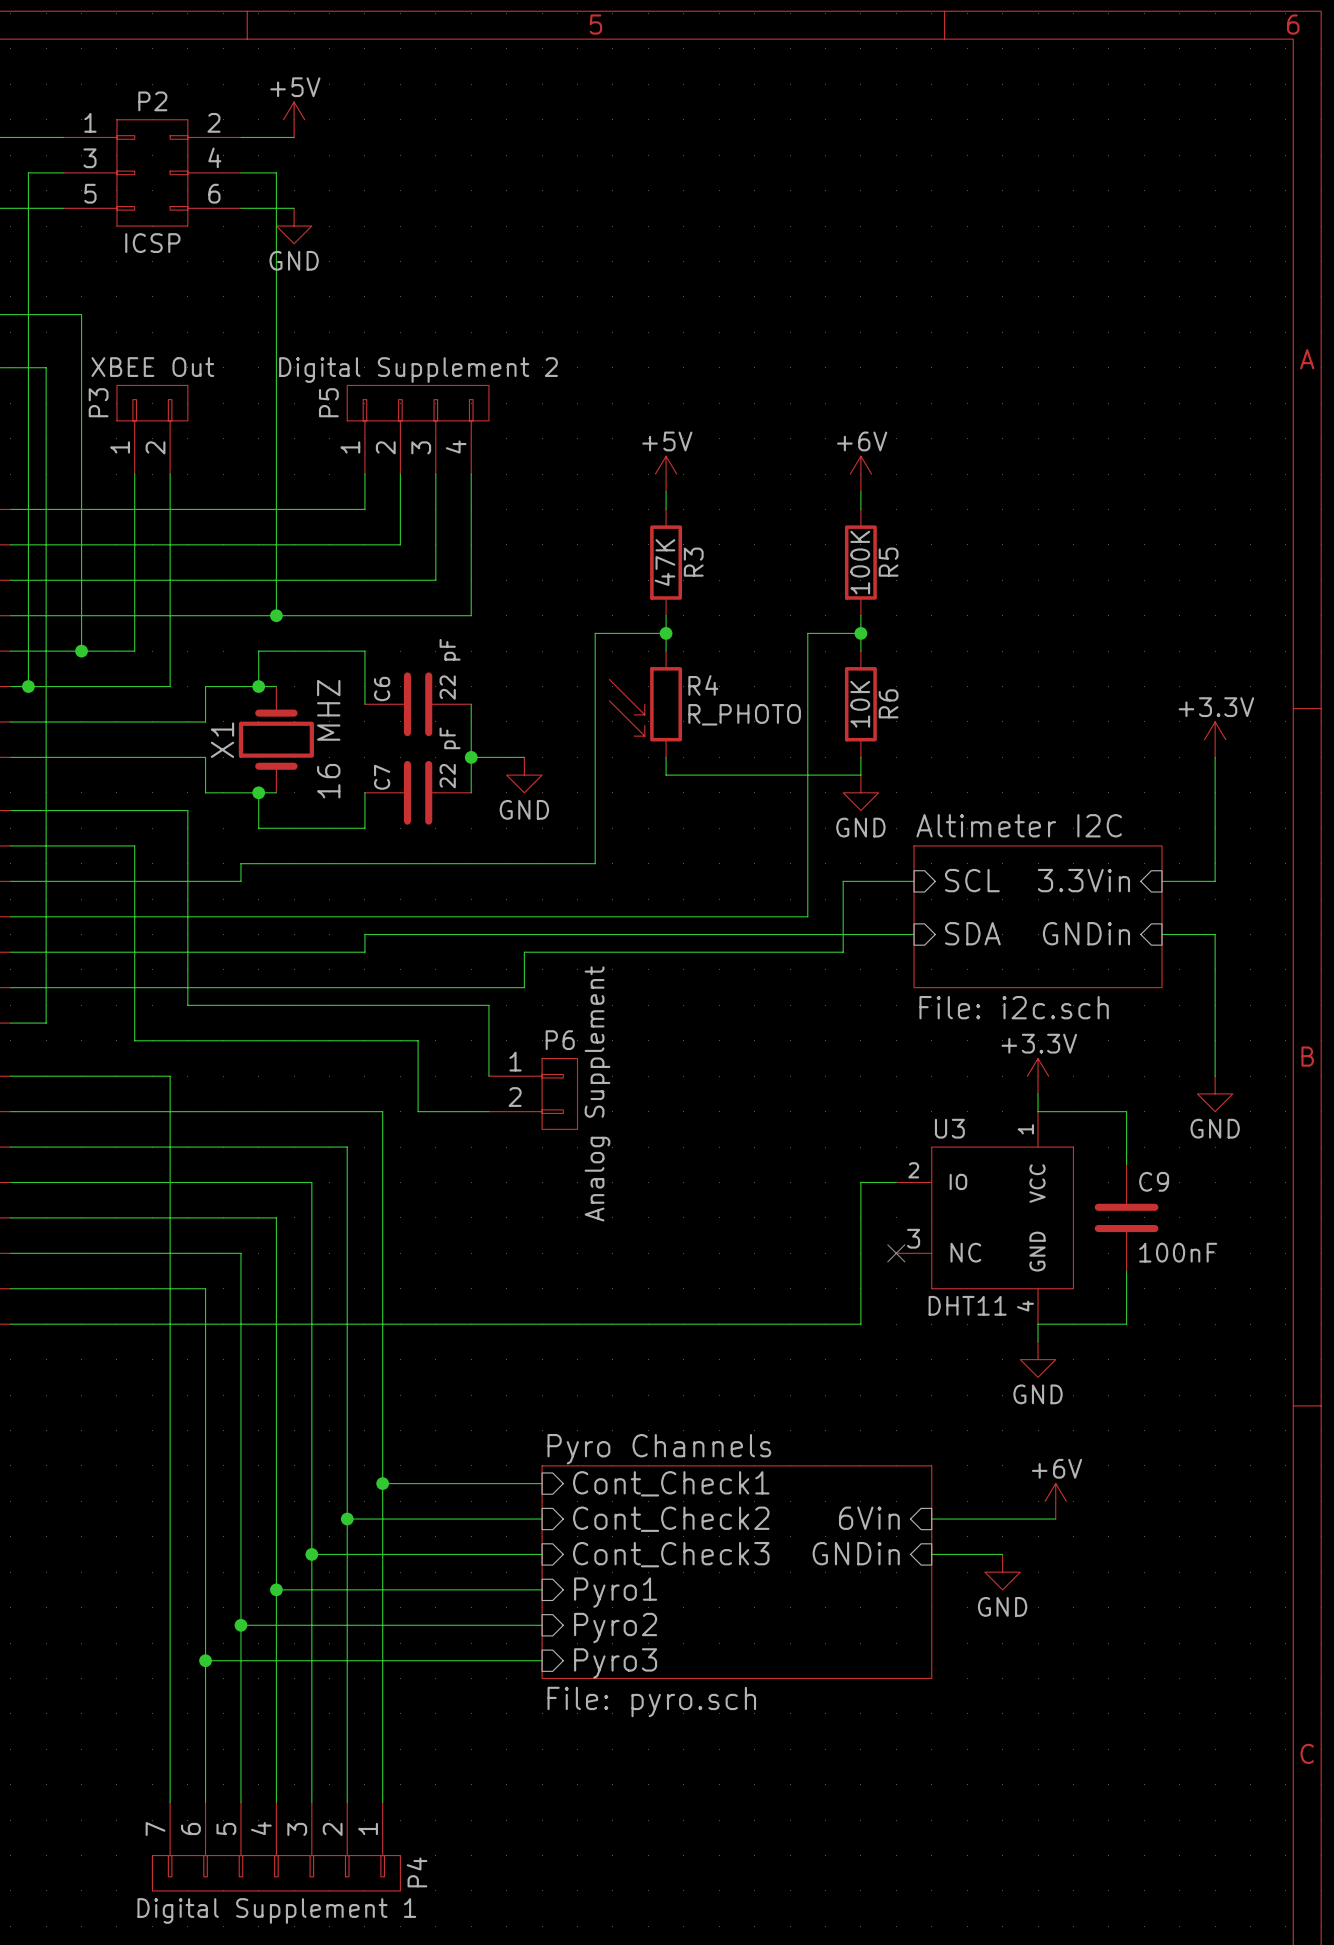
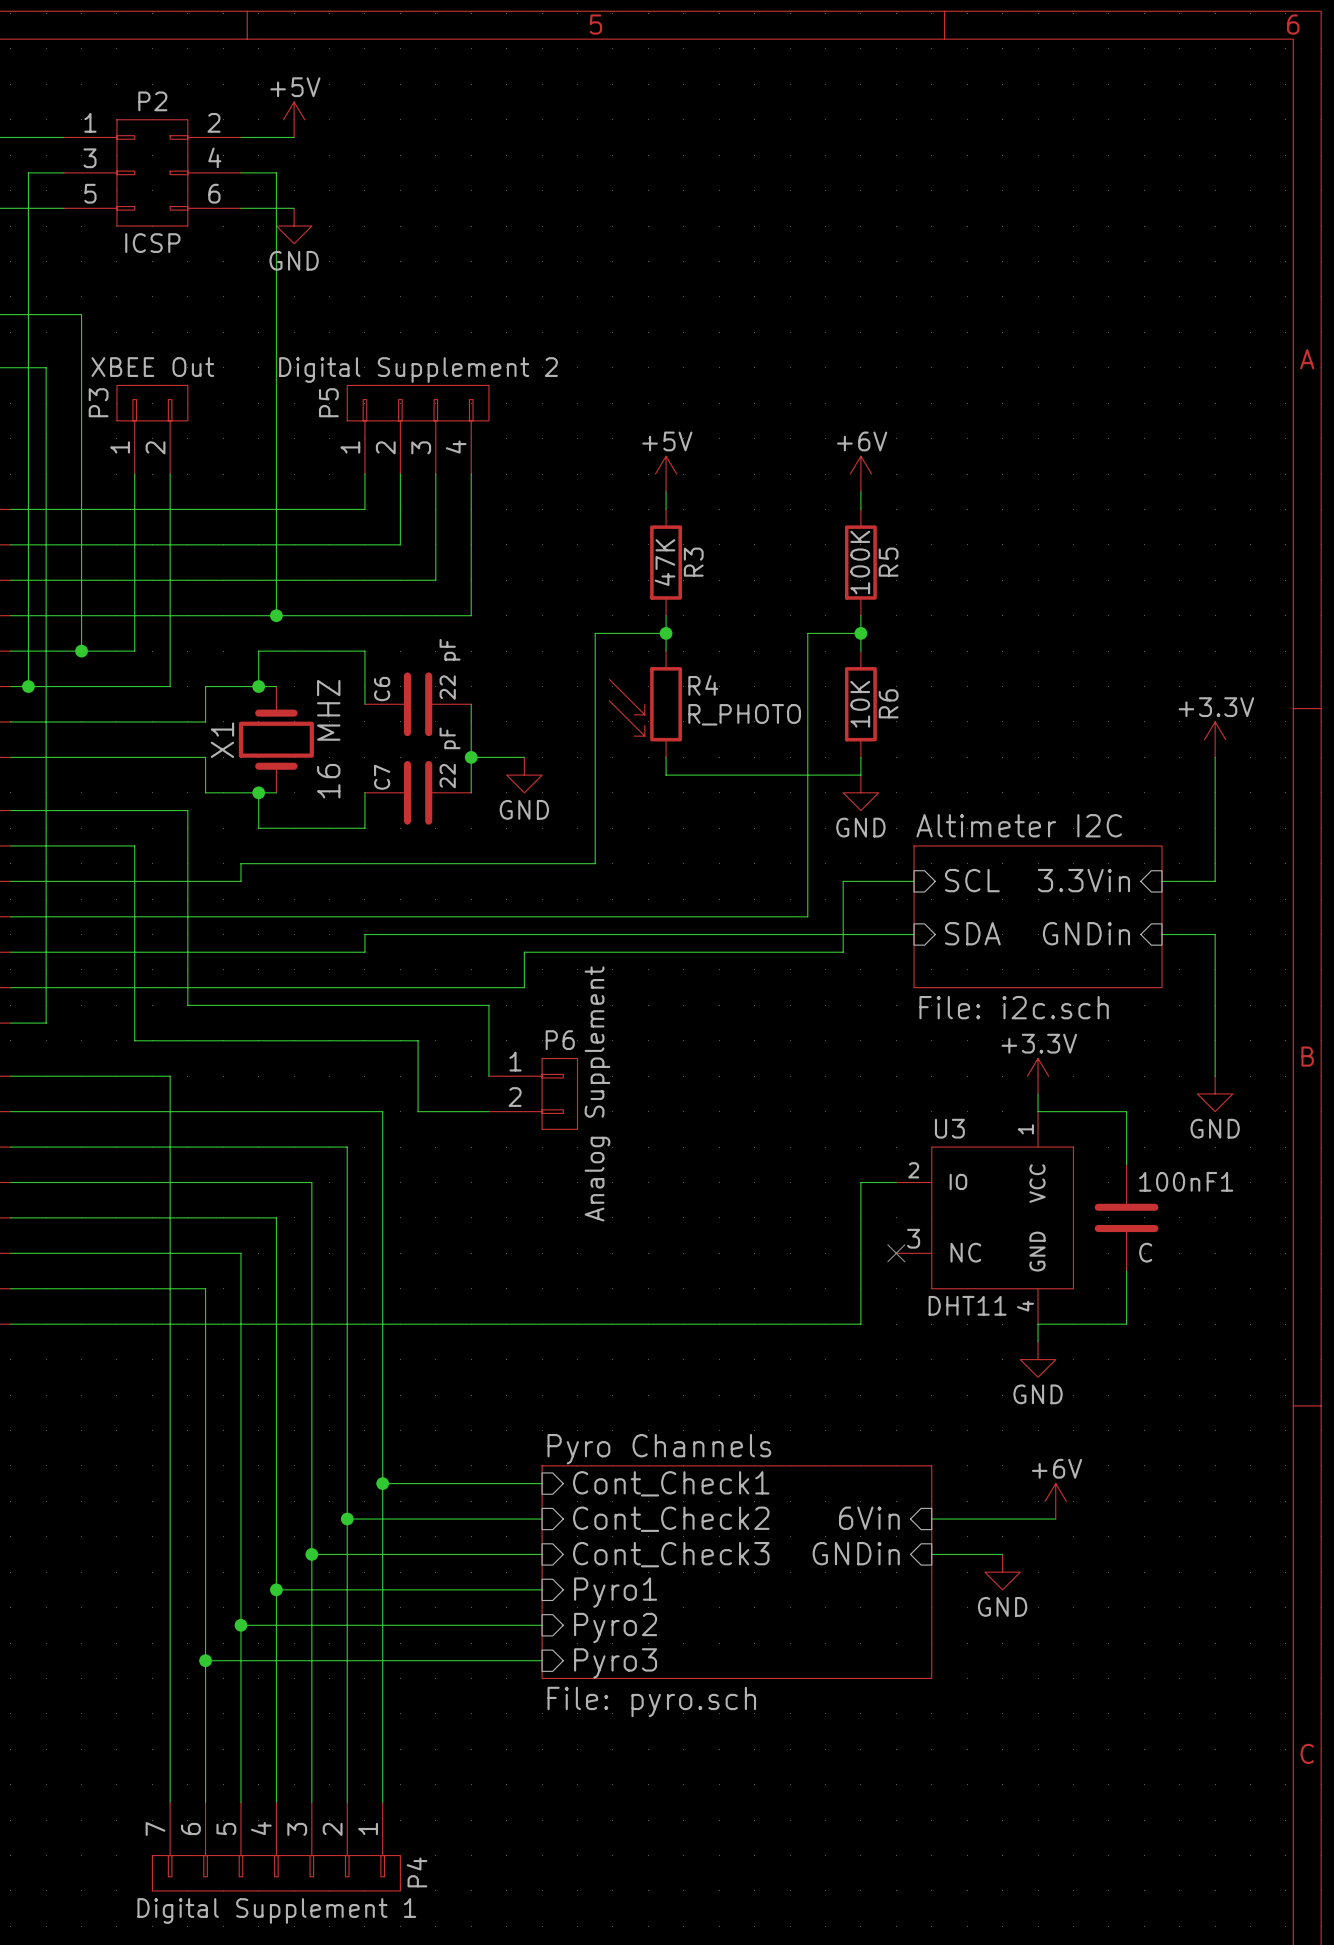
C9 name: C9 (1154, 1181) -> 100nF1 (1186, 1181)
C9 value: 100nF (1178, 1252) -> C (1145, 1252)

